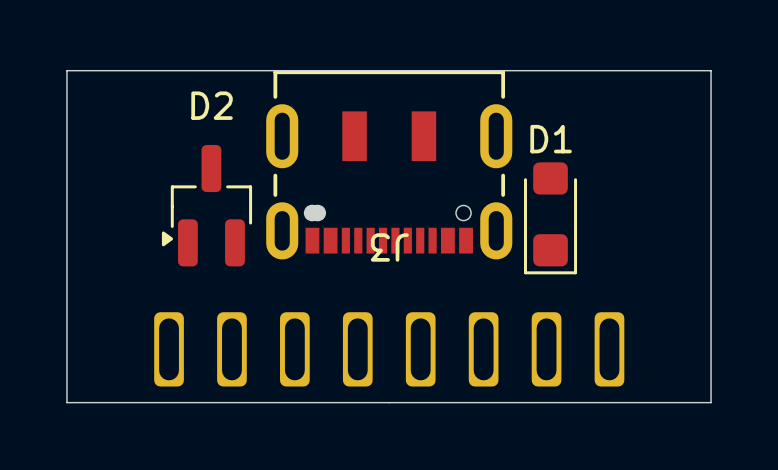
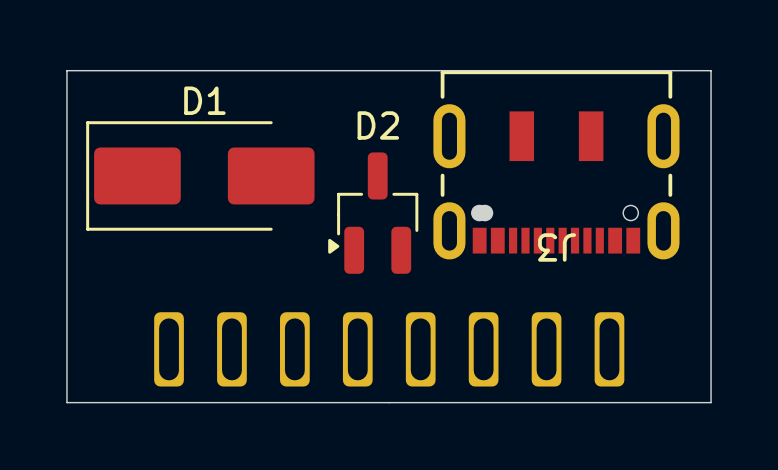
D2 name position: D2 (212, 105) -> D2 (378, 125)
D1 footprint: [524, 162, 578, 275] -> [86, 121, 315, 231]
J3 position: (389, 164) -> (556, 164)
D2 position: (206, 205) -> (373, 213)

